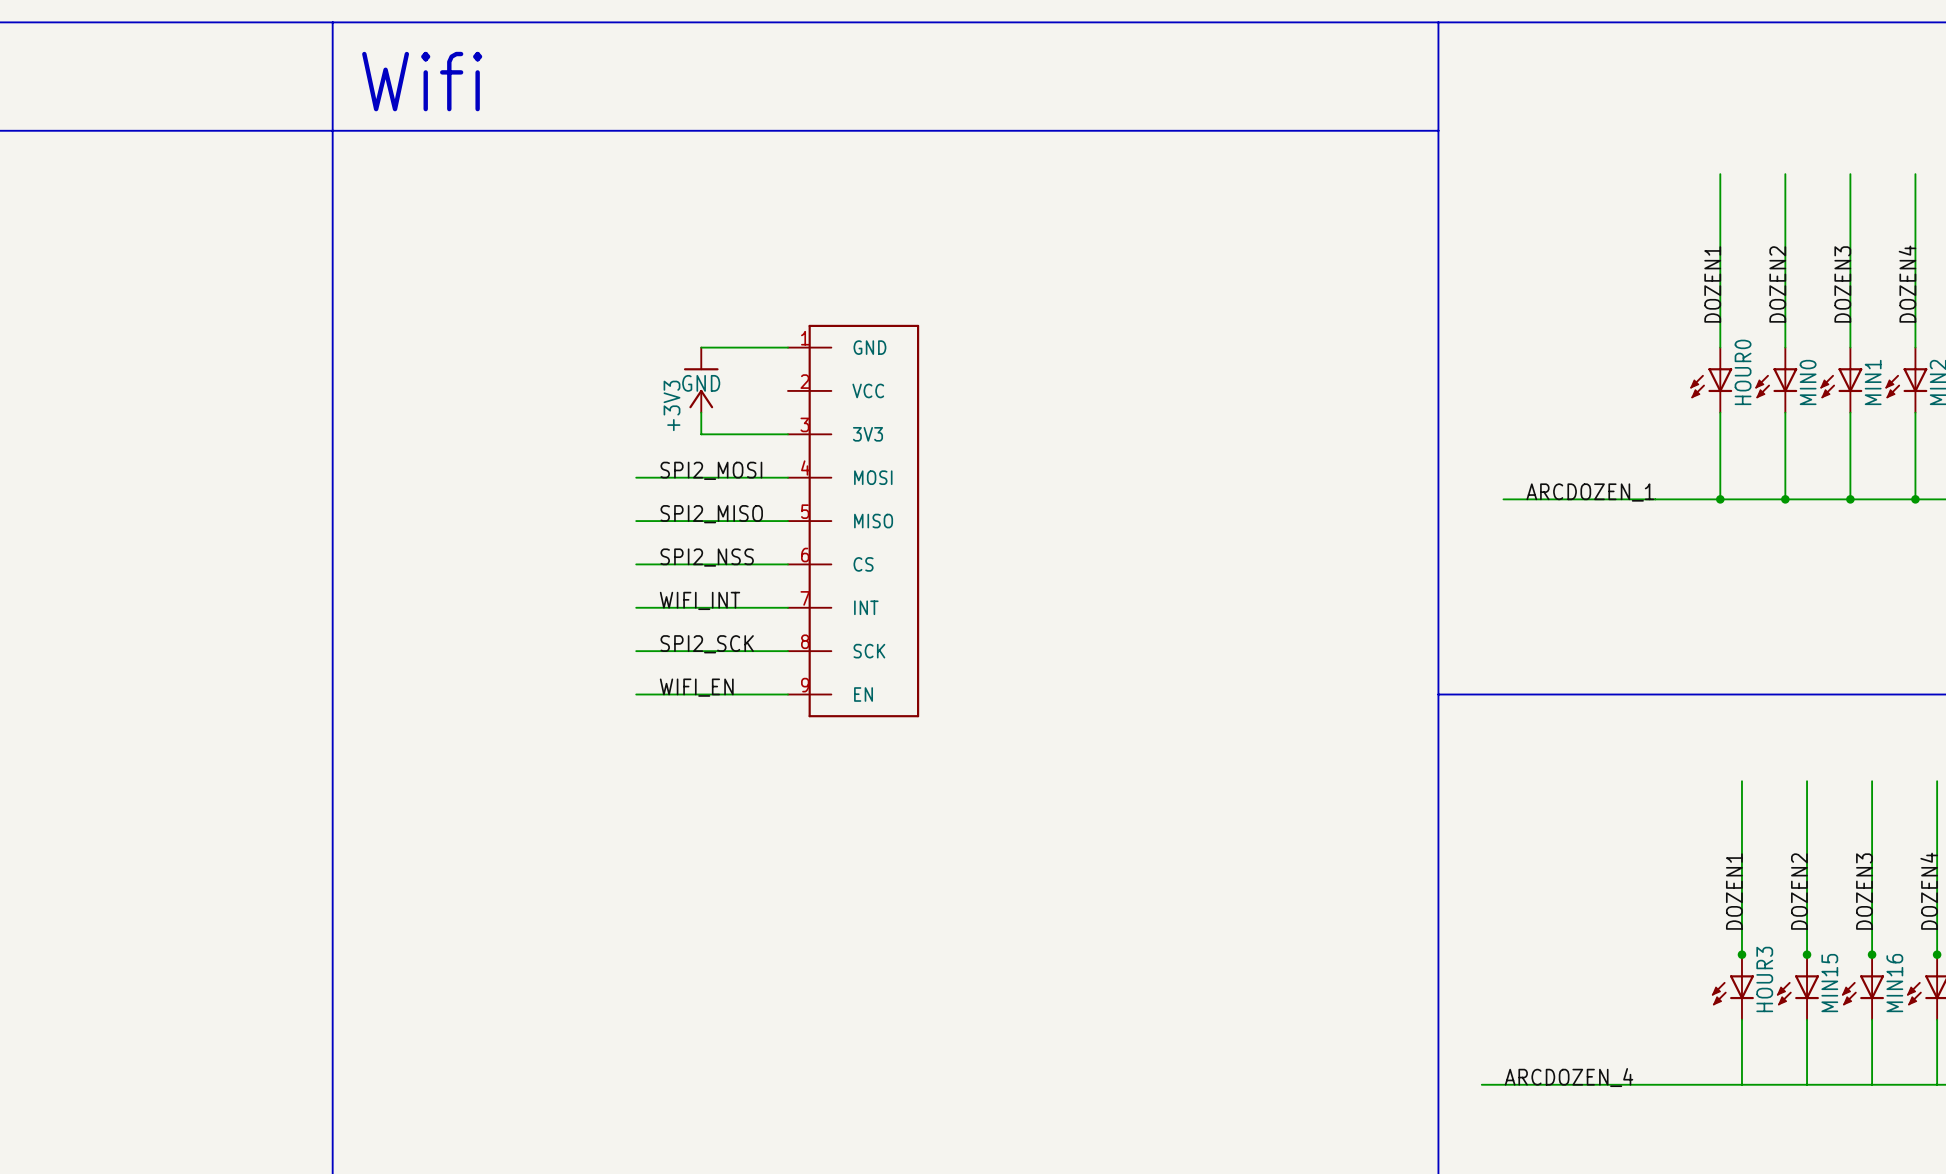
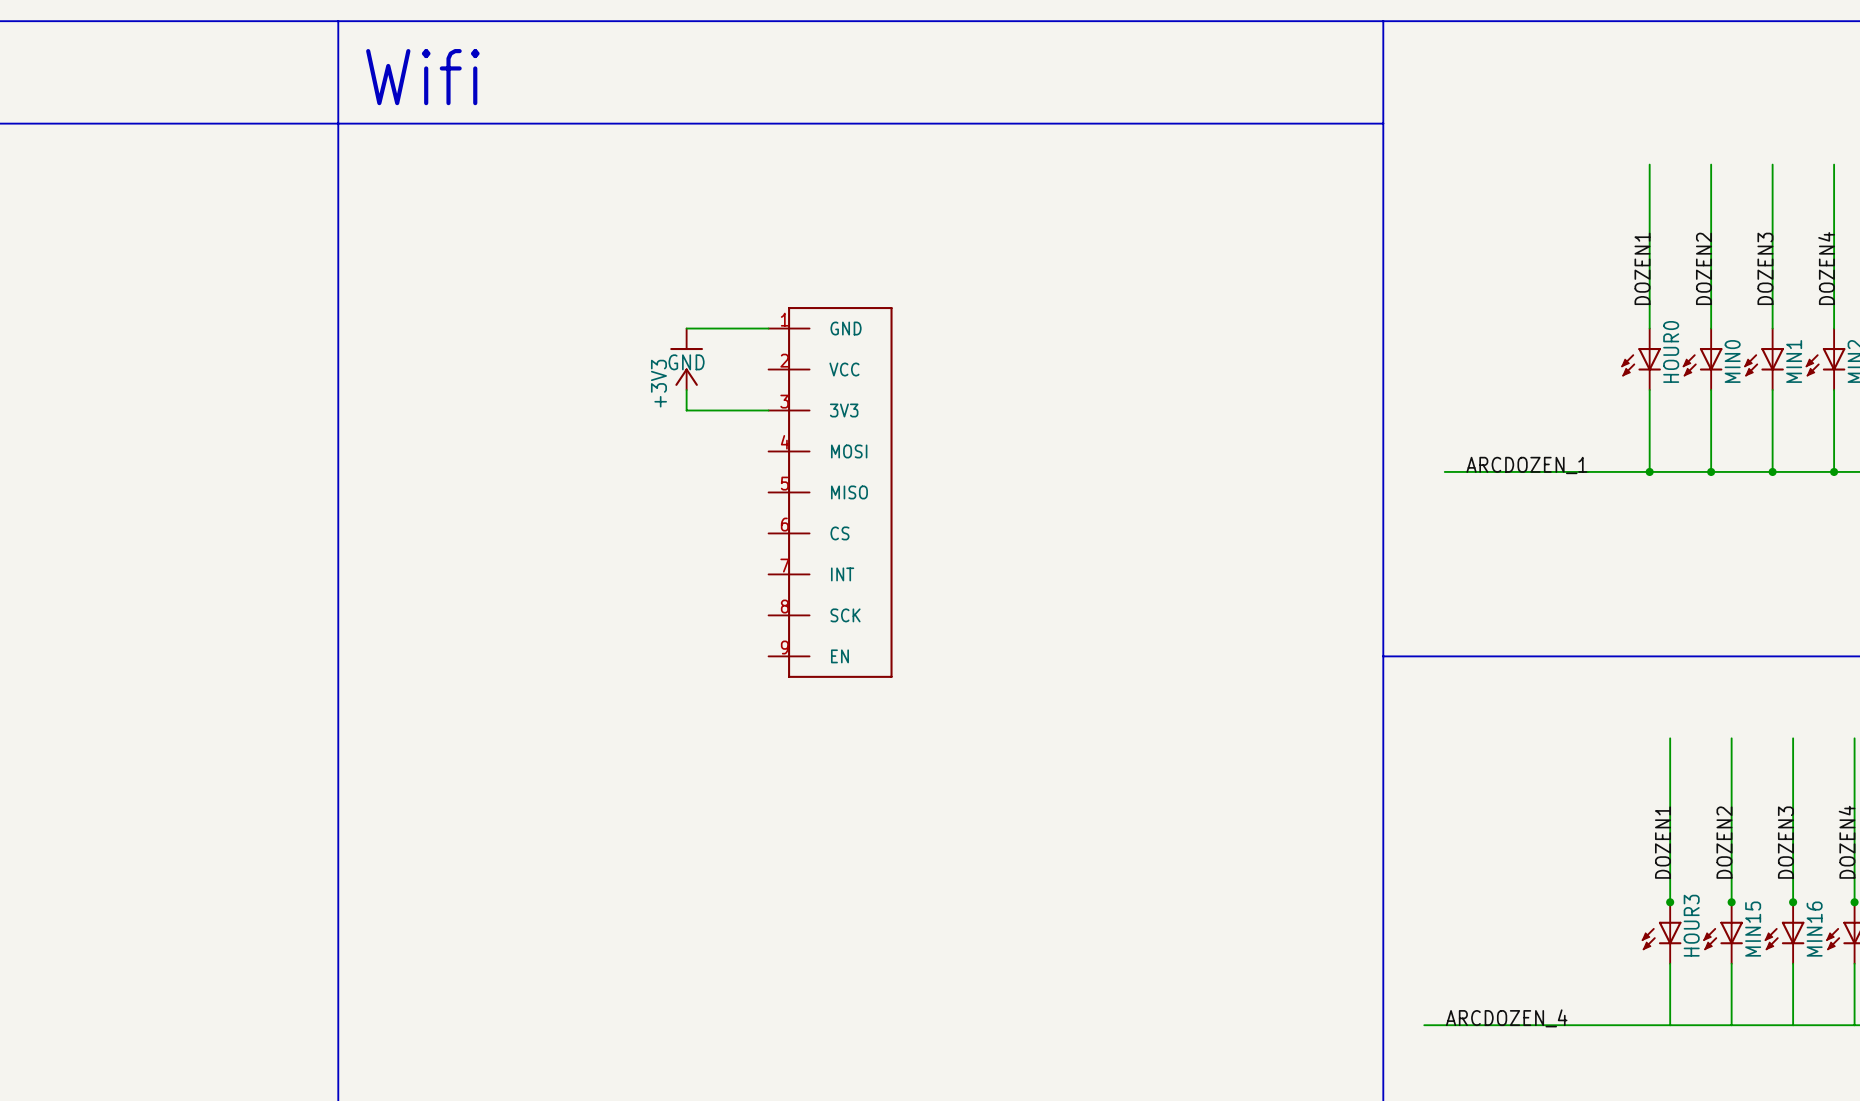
label: SPI2_MOSI (711, 470) -> none
wire: (636, 477) (788, 477) -> none
label: SPI2_MISO (711, 514) -> none
wire: (636, 521) (788, 521) -> none
label: SPI2_NSS (707, 557) -> none
wire: (636, 564) (788, 564) -> none
label: WIFI_INT (700, 600) -> none
wire: (636, 607) (788, 607) -> none
label: SPI2_SCK (707, 644) -> none
wire: (636, 651) (788, 651) -> none
label: WIFI_EN (696, 687) -> none
wire: (636, 694) (788, 694) -> none

